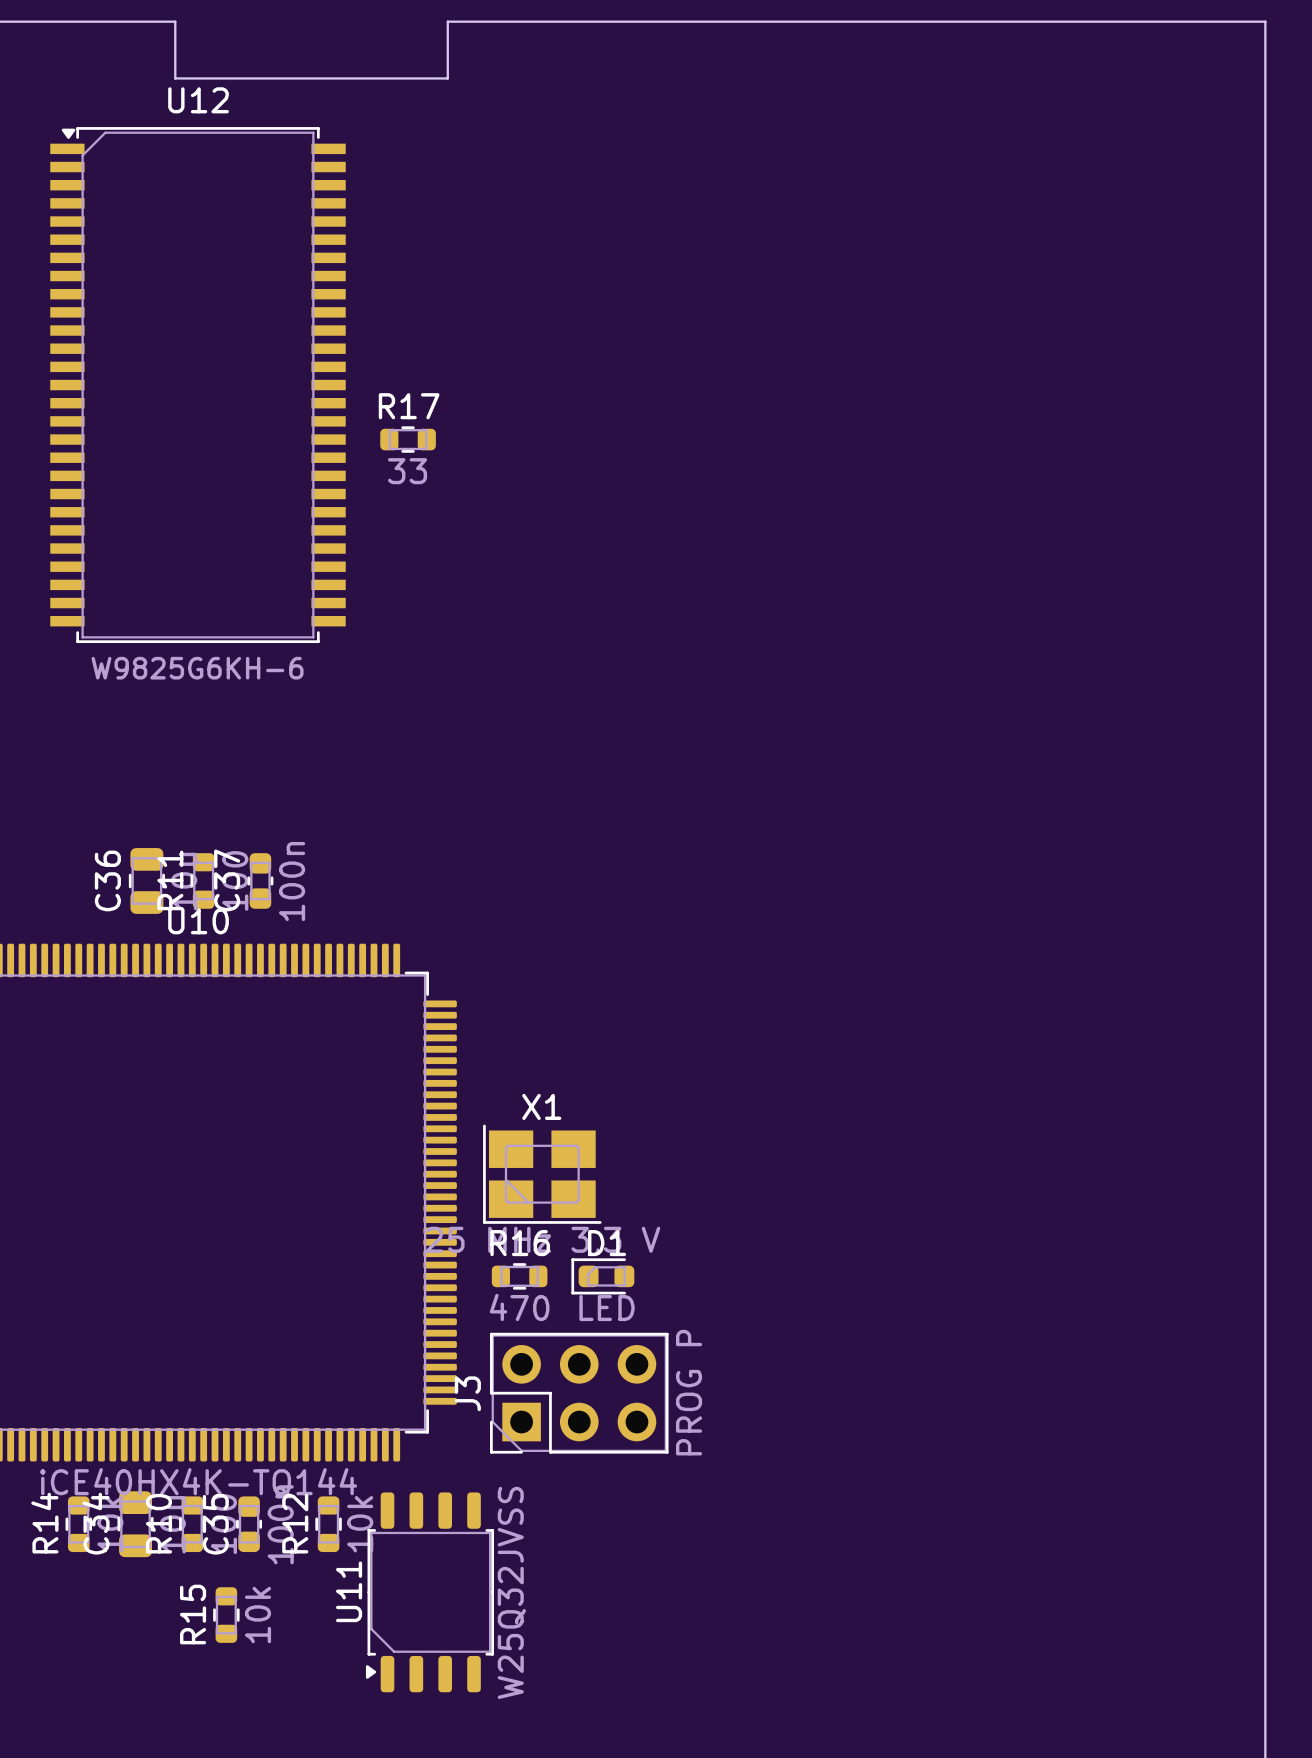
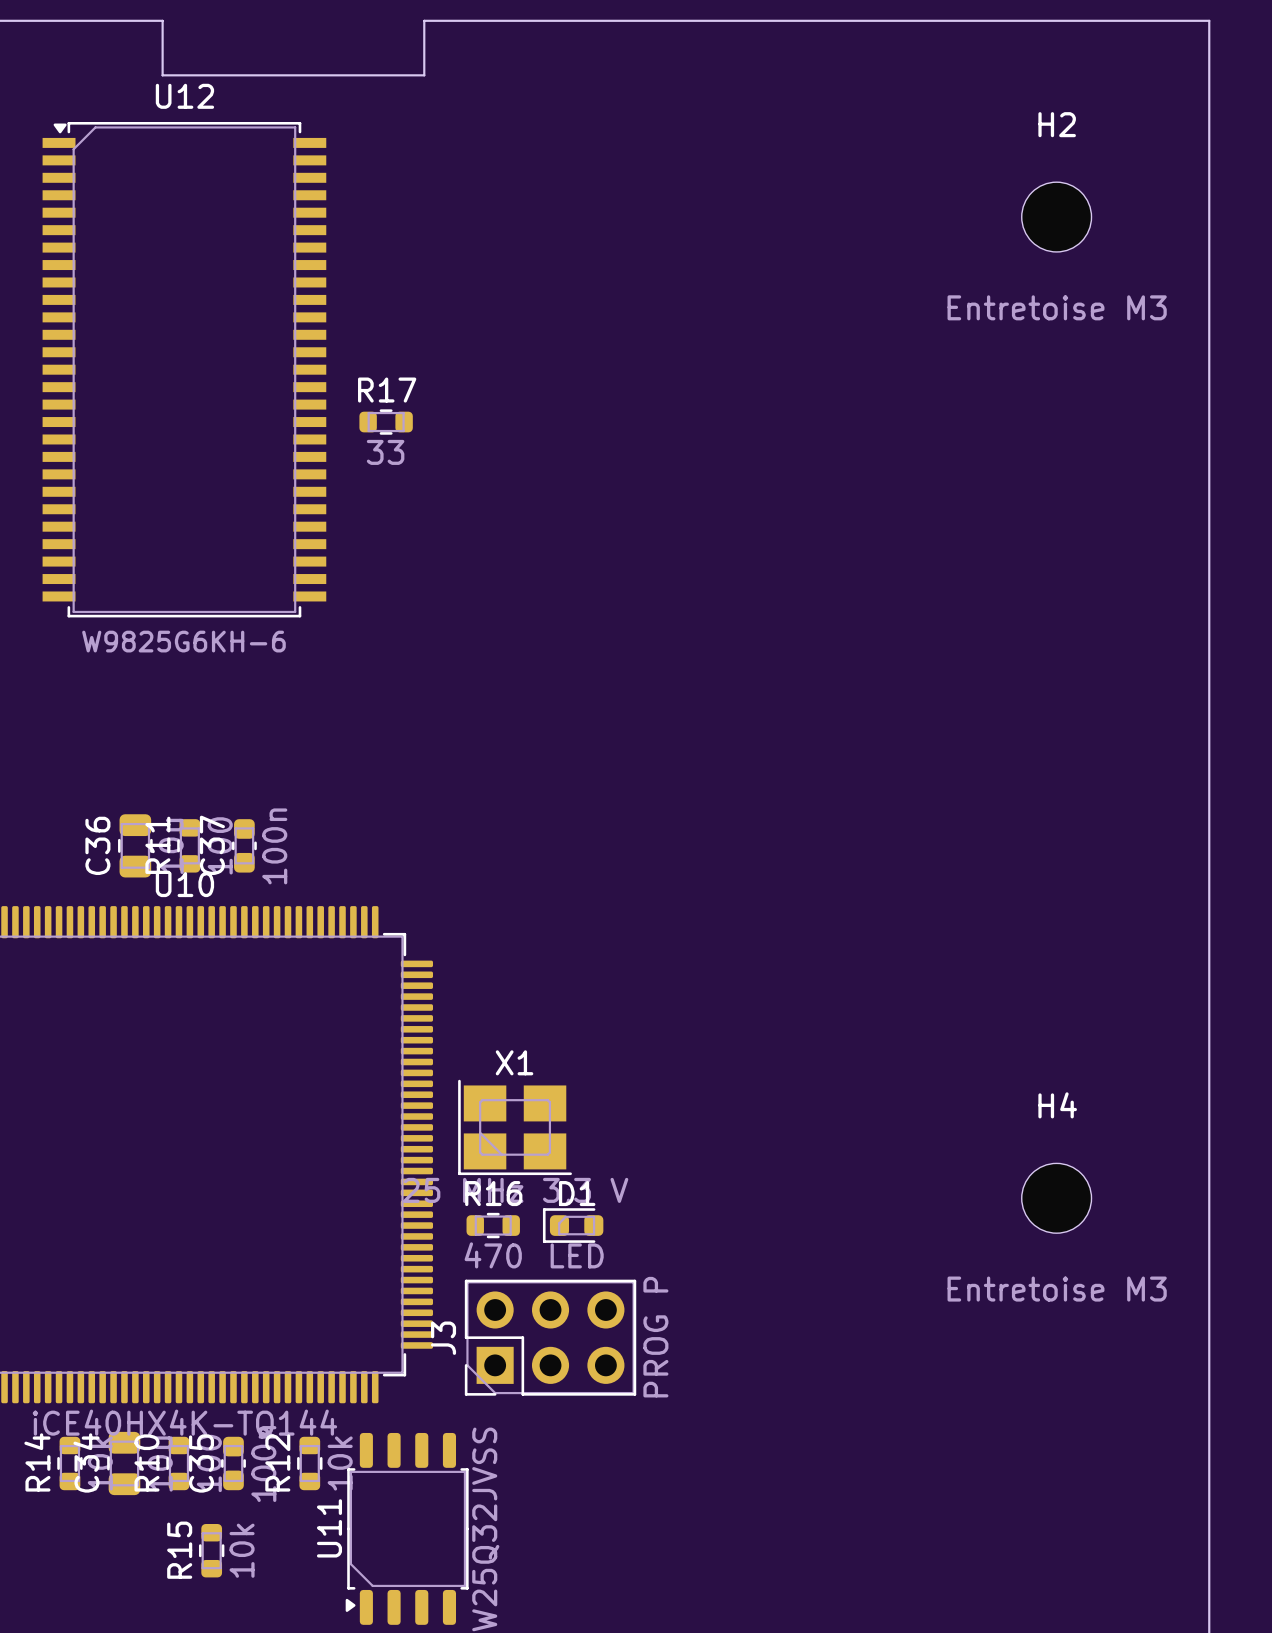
H2: none -> Entretoise M3 (1056, 217)
H4: none -> Entretoise M3 (1056, 1198)

